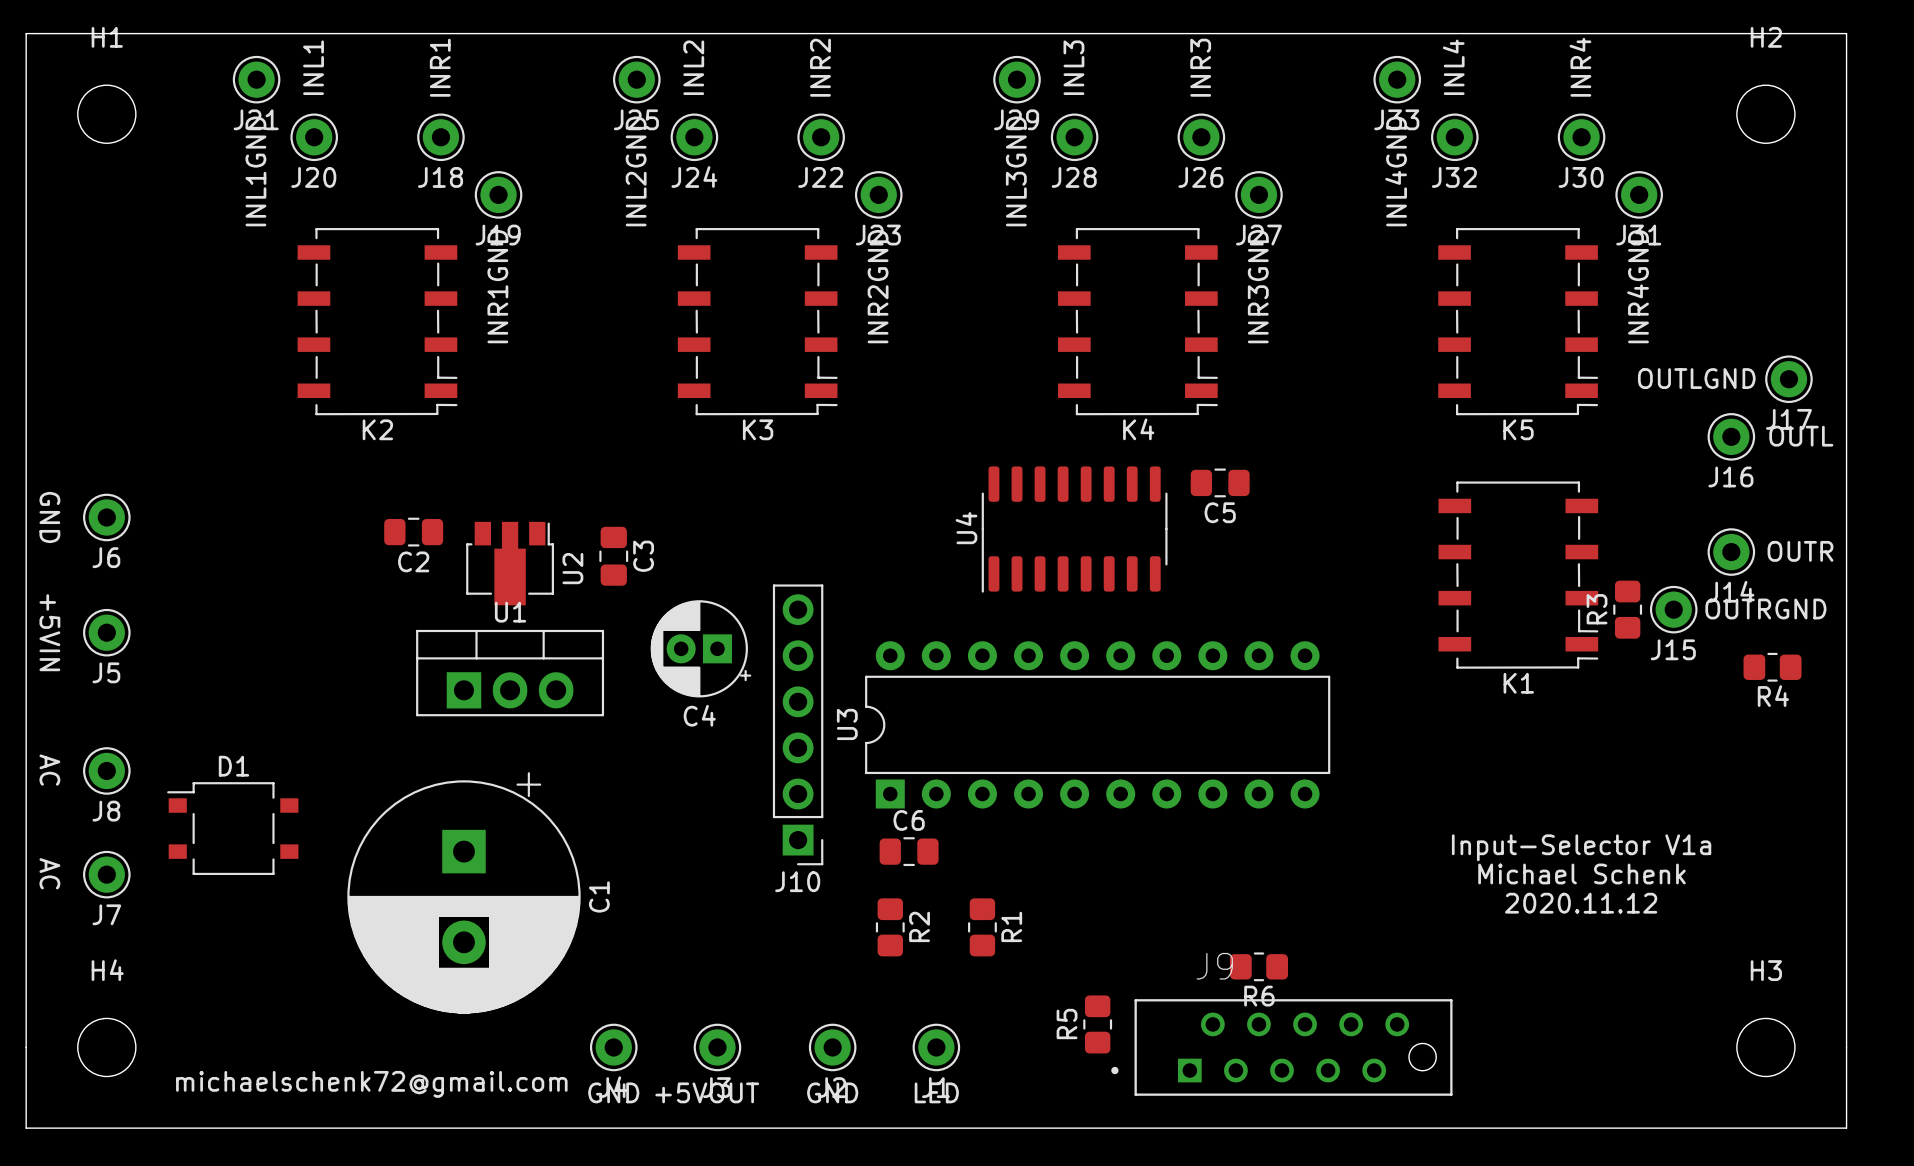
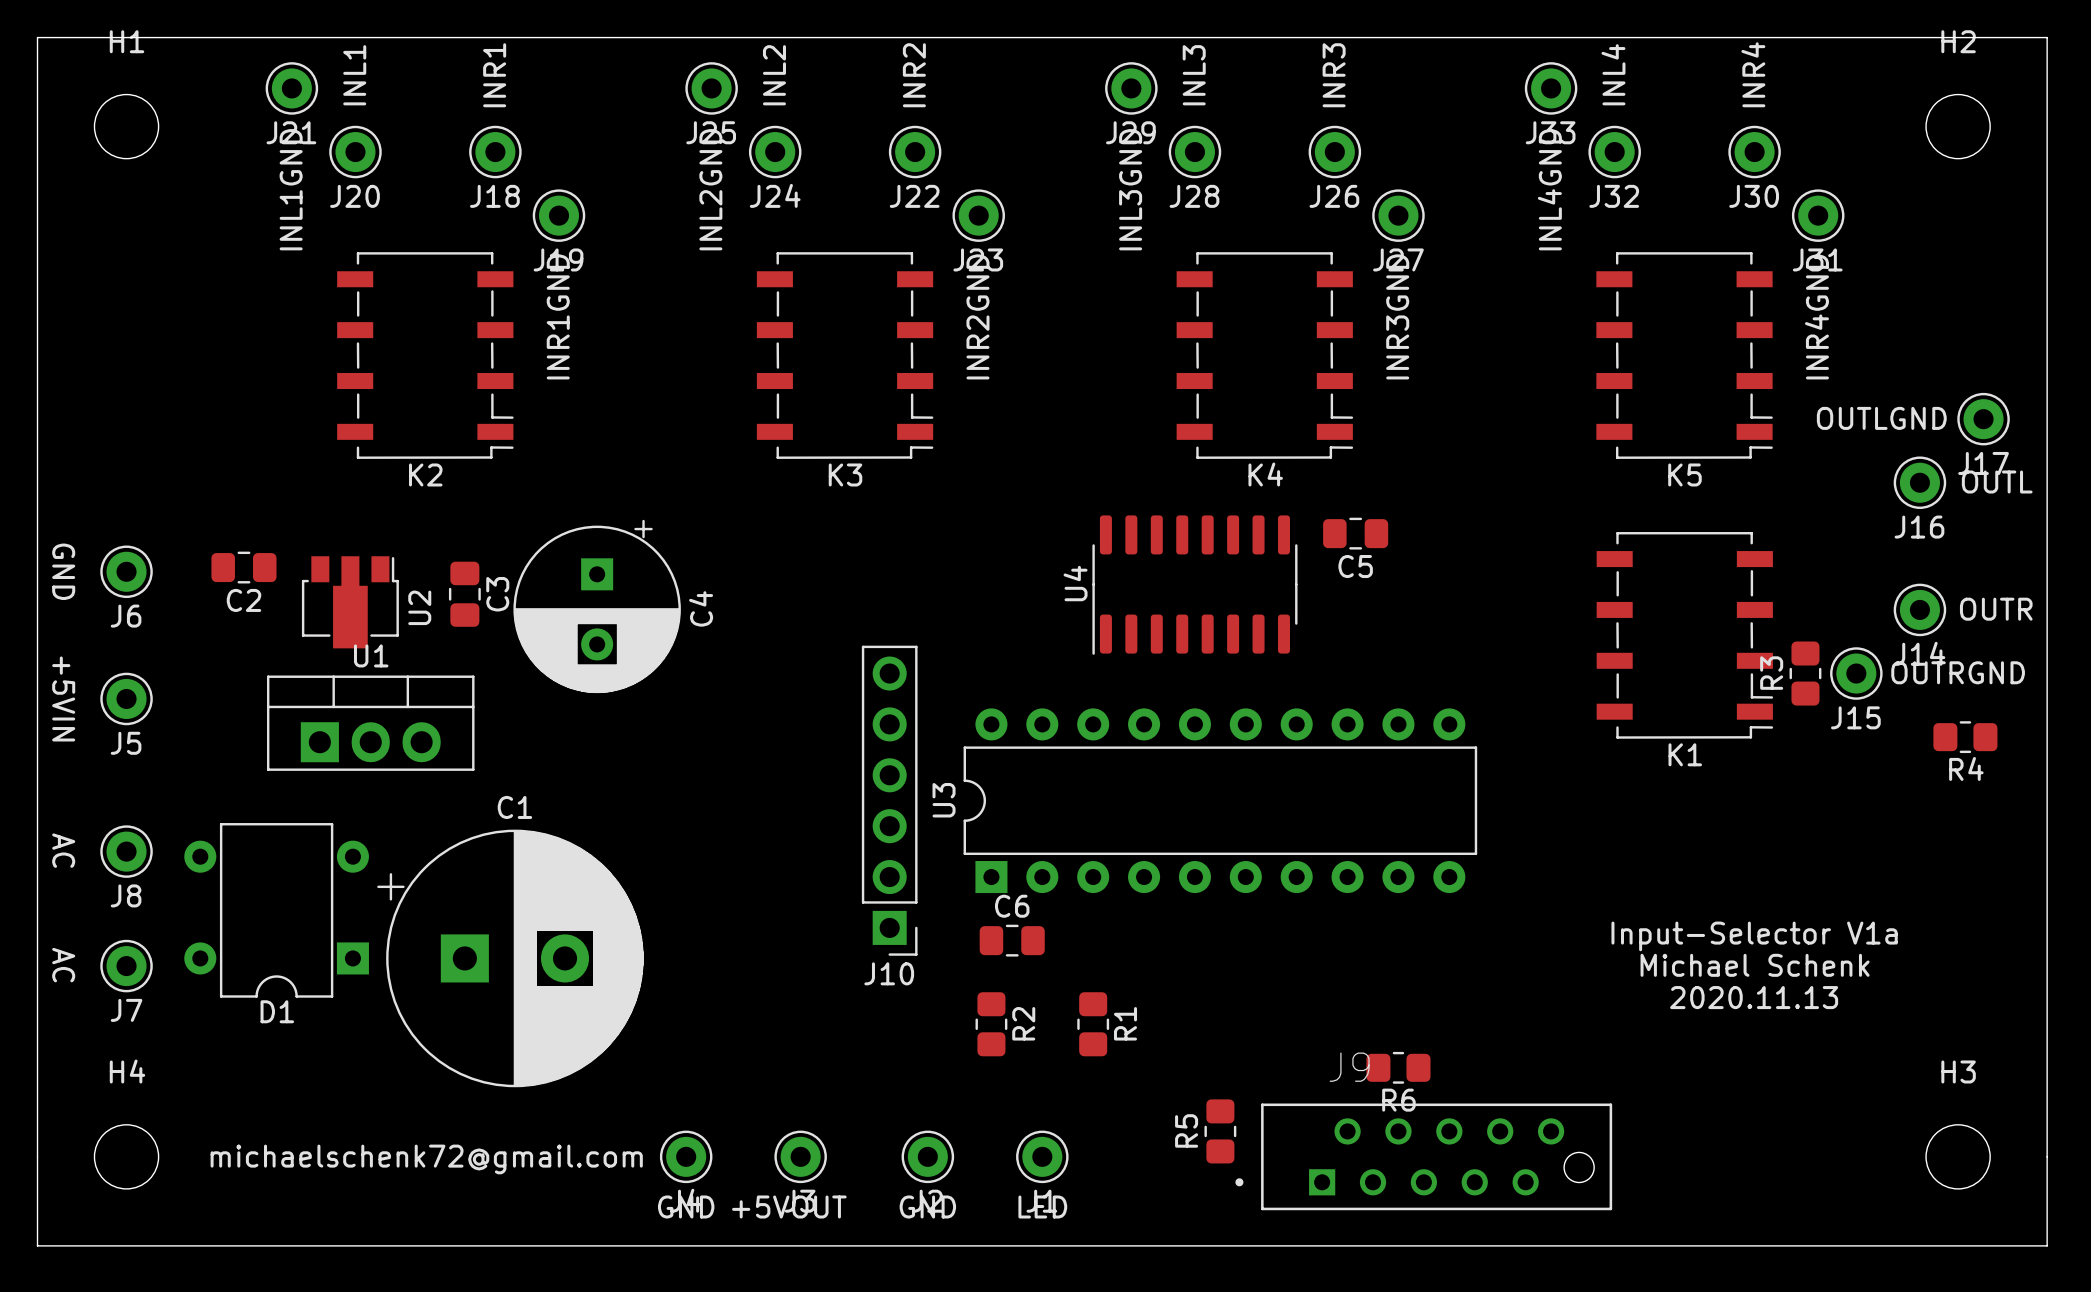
C2 position: (413, 532) -> (243, 567)
C3 position: (613, 556) -> (464, 594)
U2 position: (510, 563) -> (350, 602)
C4 footprint: [650, 600, 752, 698] -> [513, 519, 681, 694]
U1 position: (510, 673) -> (370, 723)
C4 name position: C4 (699, 715) -> C4 (701, 608)
D1 name position: D1 (233, 766) -> D1 (277, 1011)
D1 footprint: [167, 782, 299, 876] -> [184, 823, 369, 998]
C1 rotation: 0° (463, 892) -> 90° counterclockwise (510, 958)
text: 2020.11.12 (1581, 903) -> 2020.11.13 (1754, 997)
text position: michaelschenk72@gmail.com (371, 1084) -> michaelschenk72@gmail.com (426, 1159)

